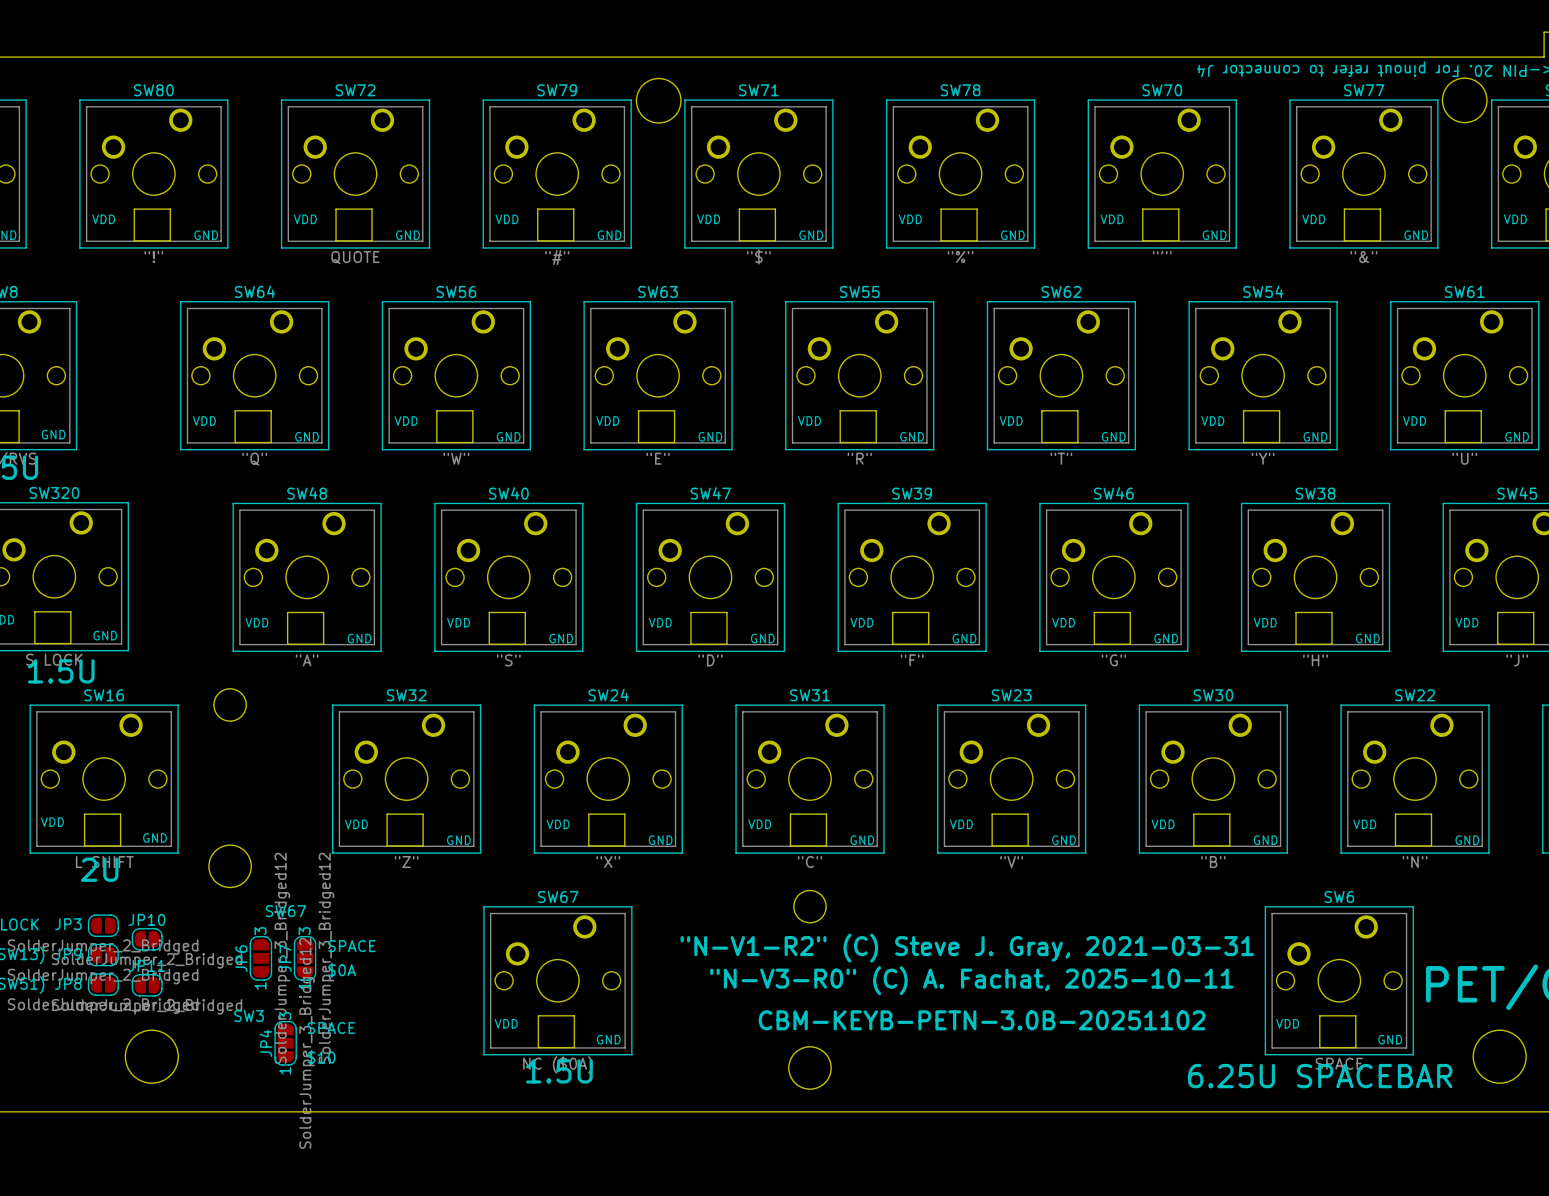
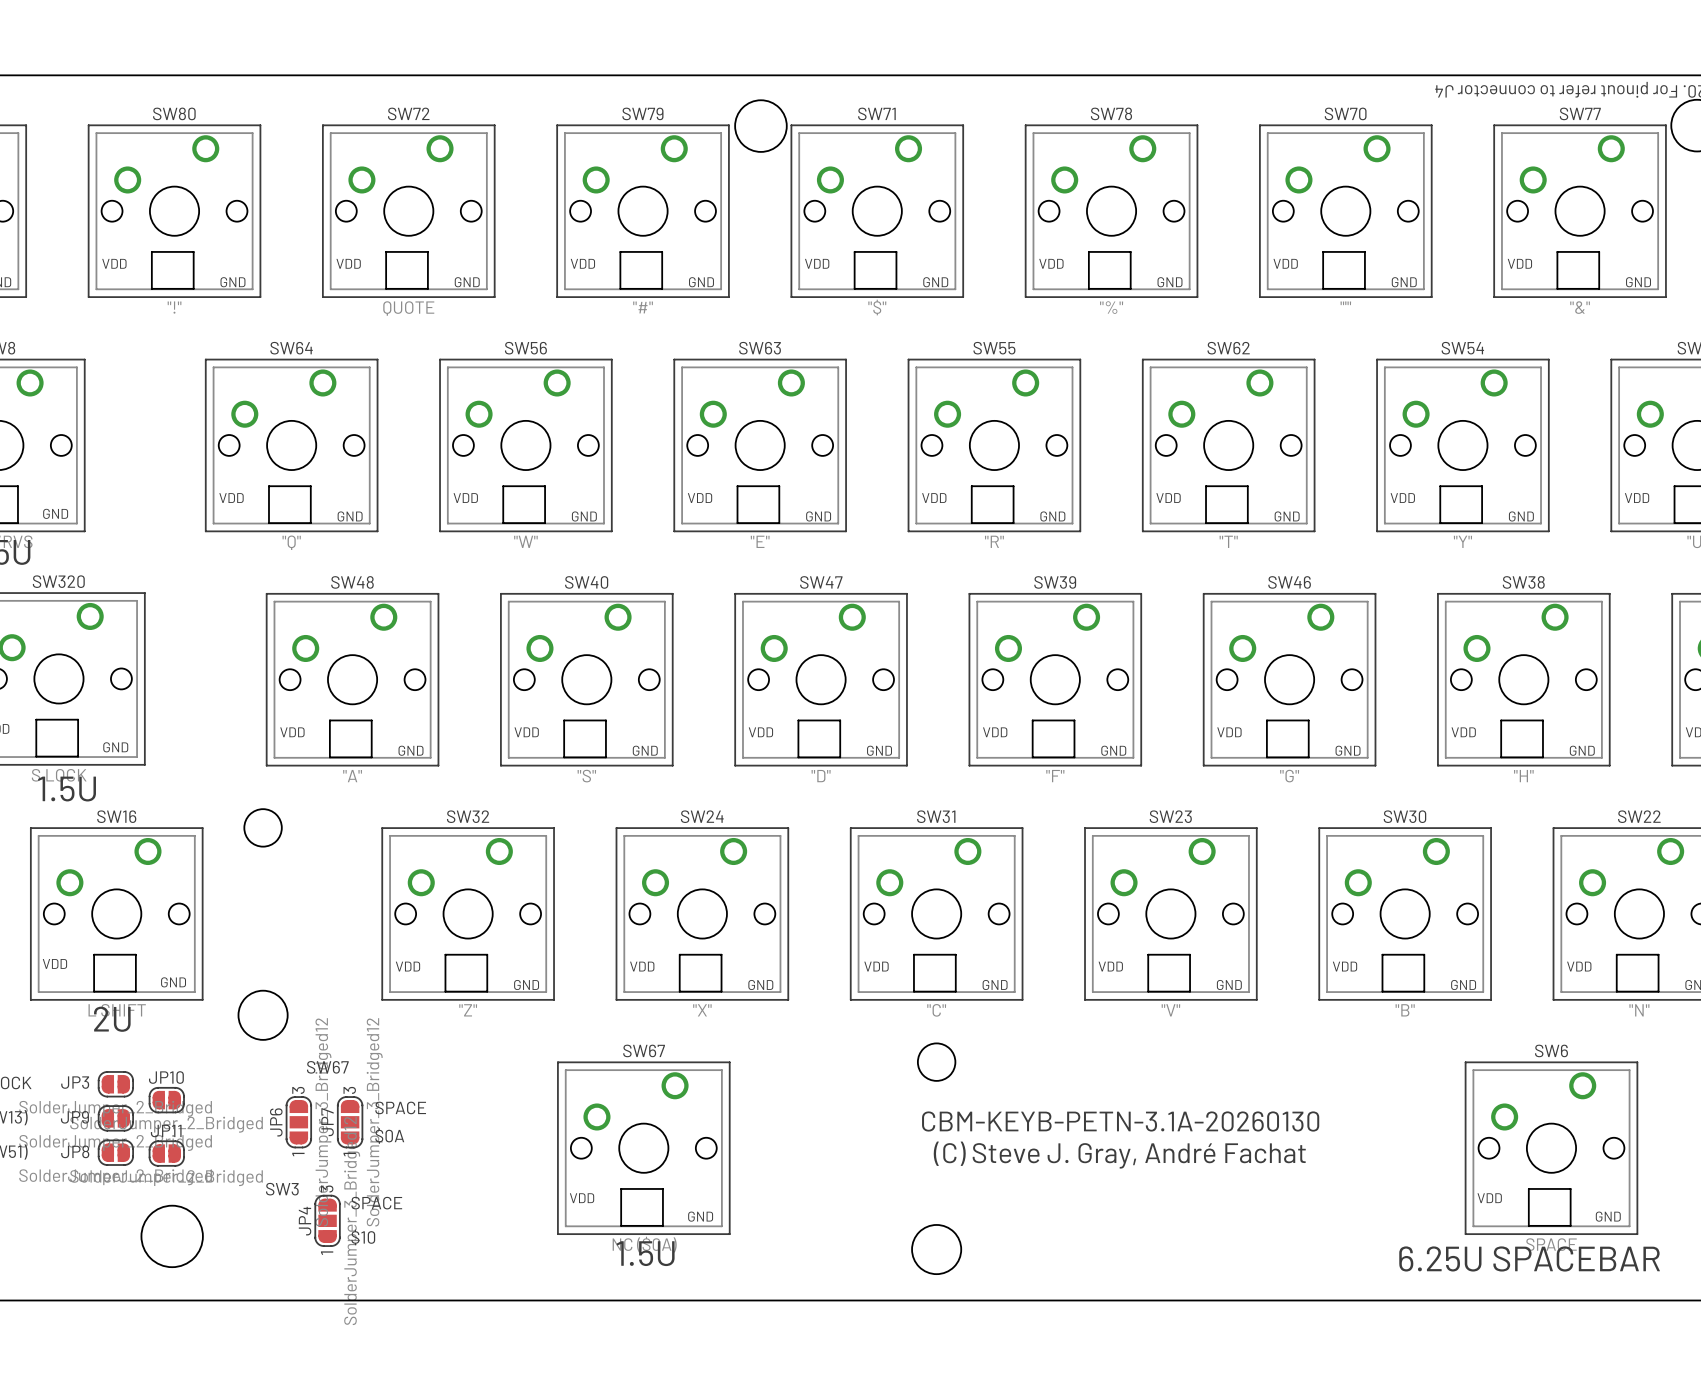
text: "N-V1-R2" (C) Steve J. Gray, 2021-03-31 (967, 948) -> none
text: none -> CBM-KEYB-PETN-3.1A-20260130 (1120, 1121)
text: "N-V3-R0" (C) A. Fachat, 2025-10-11 (971, 980) -> (C) Steve J. Gray, André Fachat (1119, 1155)
text: CBM-KEYB-PETN-3.0B-20251102 (982, 1020) -> none

